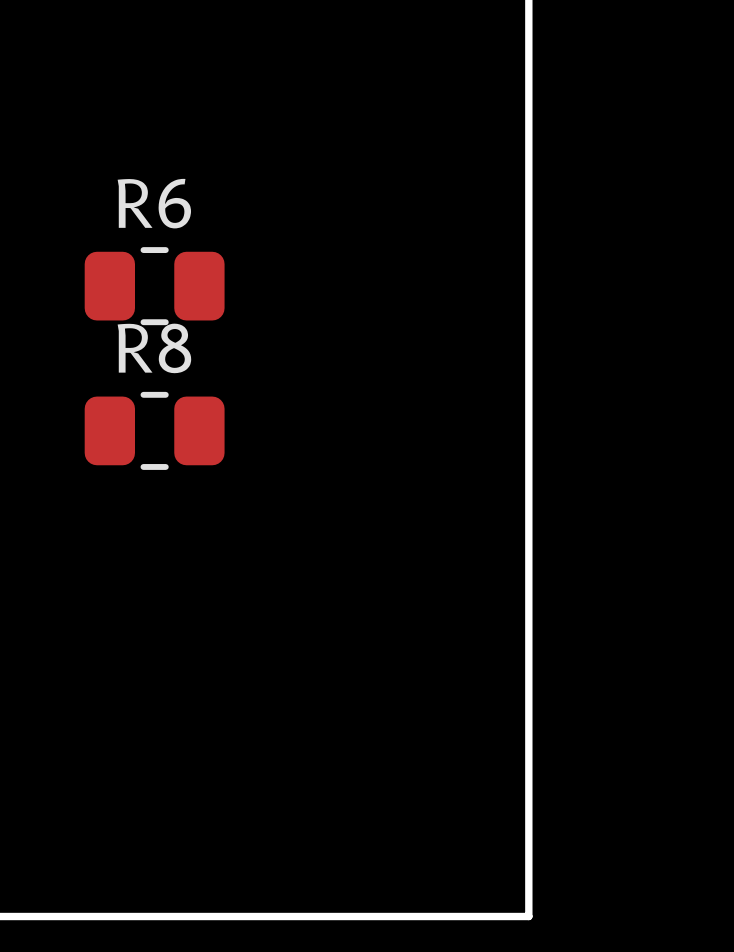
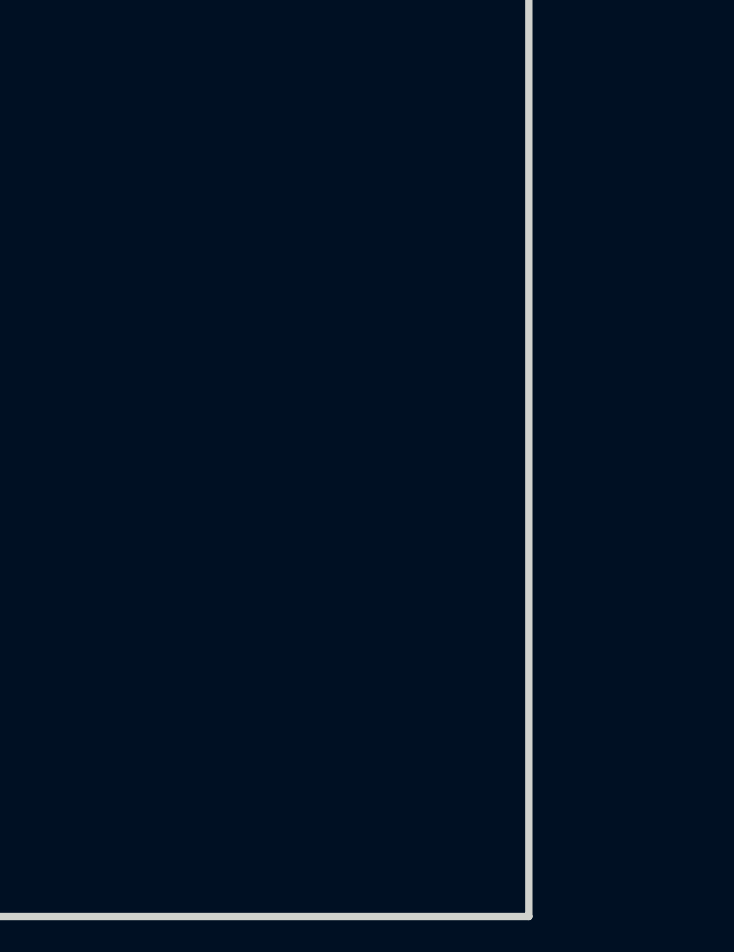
R6: (154, 286) -> none
R8: (154, 430) -> none

